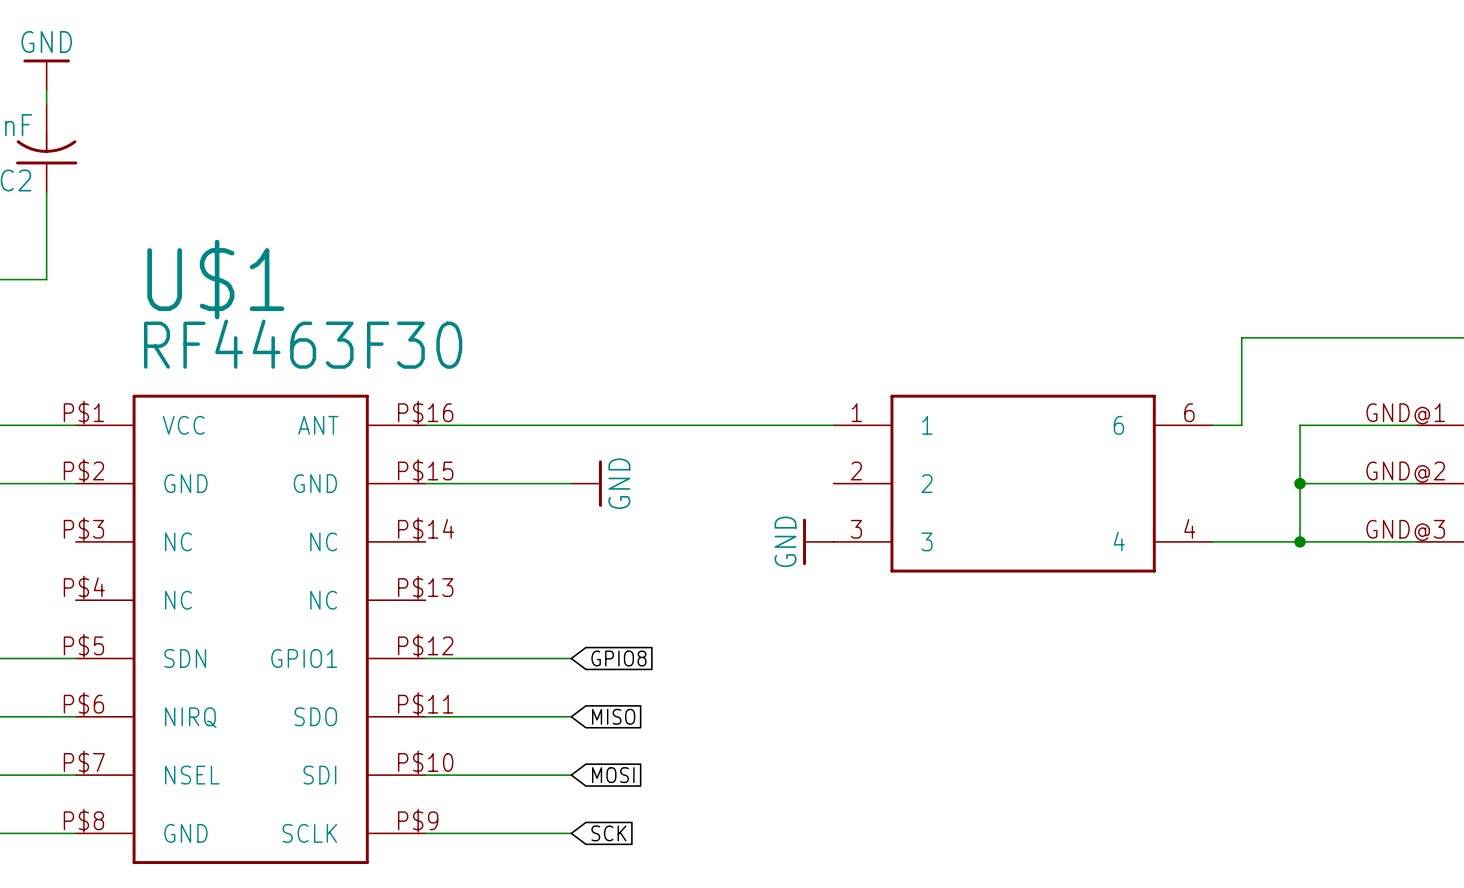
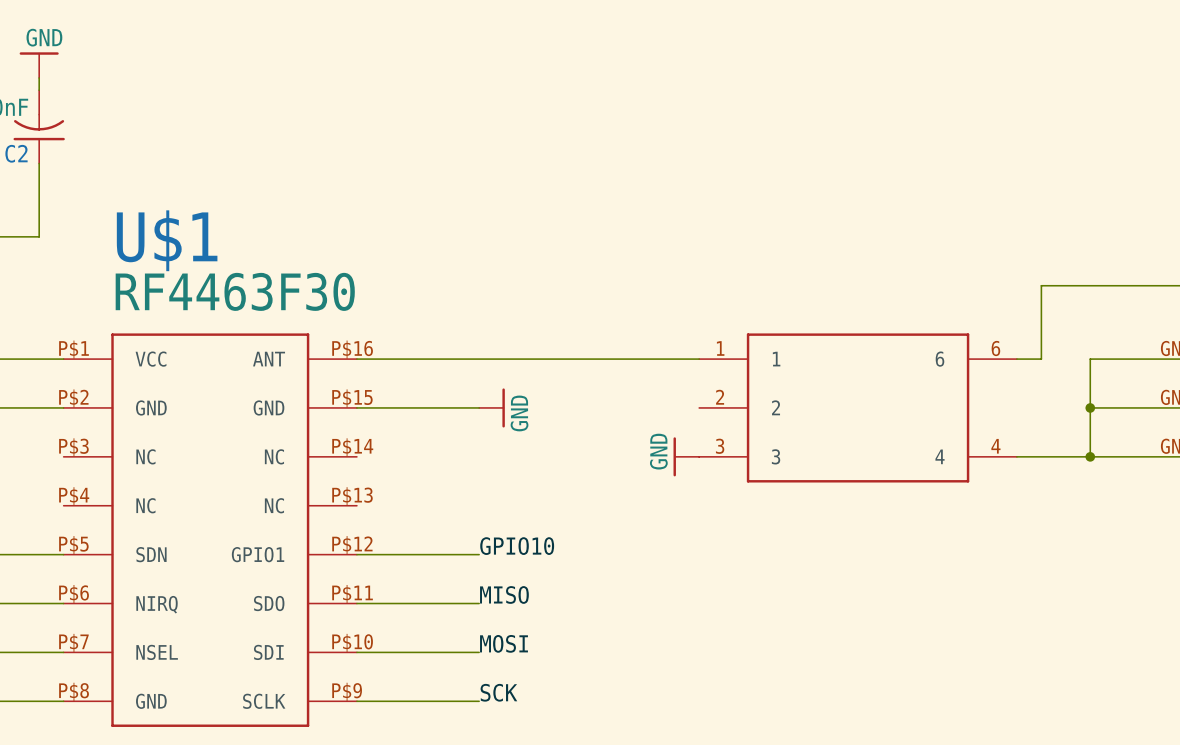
label: none -> GPIO10 (517, 546)
global label: GPIO8 (618, 658) -> none
label: none -> MISO (504, 594)
global label: MISO (613, 716) -> none
label: none -> MOSI (504, 643)
global label: MOSI (613, 775) -> none
label: none -> SCK (498, 692)
global label: SCK (608, 833) -> none

